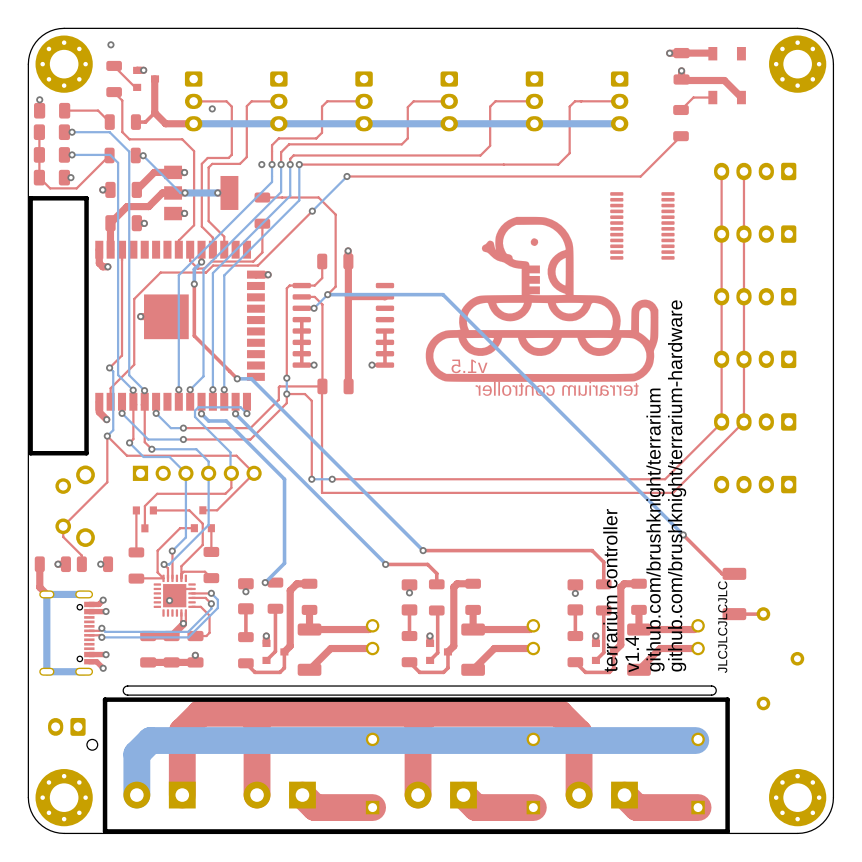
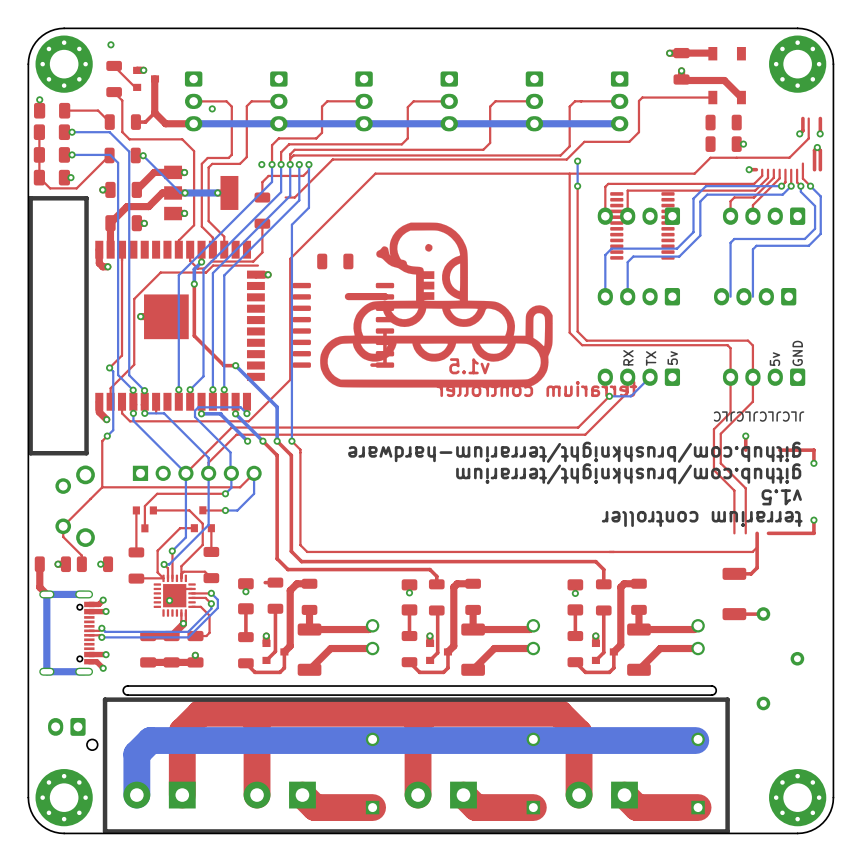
top track: (693, 97) (681, 110) -> (693, 97) (642, 97) (638, 100) (638, 132) (629, 141) (584, 141) (566, 159) (332, 159) (294, 197)
top track: none -> (802, 118) (802, 130) (799, 133)
top track: none -> (808, 118) (808, 138) (789, 157) (736, 157)
top track: none -> (820, 118) (820, 133)
part: none -> (723, 122)
part: (681, 123) -> none
via: none -> (799, 133)
via: none -> (820, 133)
top track: (681, 136) (640, 176) (347, 176) -> none
top track: (490, 142) (490, 145) (480, 155) -> (569, 146) (560, 155) (480, 155)
top track: none -> (490, 142) (483, 149) (294, 149) (290, 154) (290, 158)
part: none -> (723, 144)
via: none -> (743, 144)
top track: (569, 146) (569, 153) (558, 164) (299, 164) -> none
via: none -> (817, 147)
top track: none -> (736, 157) (710, 157) (694, 173) (375, 173) (290, 258) (290, 379) (248, 421) (130, 421) (122, 413)
bottom track: none -> (577, 161) (577, 188)
via: none -> (577, 161)
top track: none -> (802, 163) (802, 178) (810, 186)
bottom track: none -> (308, 164) (308, 207) (291, 224) (291, 441)
via: none -> (308, 164)
via: none -> (749, 169)
top track: none -> (756, 169) (749, 169)
top track: none -> (762, 169) (762, 175) (754, 183) (608, 183) (605, 186) (605, 216)
top track: none -> (768, 169) (768, 177) (755, 190) (627, 190) (627, 216)
top track: none -> (773, 169) (773, 177) (754, 197) (734, 197) (730, 201) (730, 216)
top track: none -> (779, 169) (779, 178) (752, 205) (752, 216)
top track: none -> (785, 169) (785, 182) (781, 186)
top track: none -> (791, 169) (791, 186)
top track: none -> (797, 169) (797, 182) (800, 186)
top track: none -> (820, 169) (820, 150) (817, 147) (814, 150) (814, 169)
top track: (721, 171) (721, 422) (665, 479) (332, 479) -> none
top track: (743, 171) (743, 421) (673, 492) (322, 492) (322, 386) -> none
part: (755, 171) -> none
top track: none -> (569, 173) (569, 332) (582, 345) (727, 345) (730, 348) (730, 412) (713, 429) (713, 470) (734, 490) (734, 533)
bottom track: (347, 176) (312, 211) -> none
via: (347, 176) -> none
top track: none -> (577, 186) (577, 331) (586, 340) (748, 340) (752, 345) (752, 401) (720, 433) (720, 463) (745, 488) (745, 533)
via: none -> (577, 186)
bottom track: none -> (781, 186) (706, 186) (693, 198) (693, 232) (677, 248) (611, 248) (605, 255) (605, 296)
via: none -> (781, 186)
bottom track: none -> (791, 186) (782, 194) (707, 194) (700, 201) (700, 235) (679, 256) (633, 256) (627, 262) (627, 296)
via: none -> (791, 186)
bottom track: none -> (800, 186) (800, 191) (815, 206) (815, 228) (804, 238) (734, 238) (730, 242) (730, 296)
via: none -> (800, 186)
bottom track: none -> (810, 186) (820, 196) (820, 233) (808, 245) (756, 245) (752, 249) (752, 296)
via: none -> (810, 186)
top track: (285, 197) (262, 197) -> (308, 164) (308, 170) (303, 175) (268, 175) (262, 182) (262, 197)
top track: (294, 197) (318, 197) (335, 214) (335, 286) (327, 294) -> none
top track: (312, 211) (257, 265) -> none
via: (312, 211) -> none
part: none -> (638, 216)
part position: (755, 234) -> (764, 216)
top track: (348, 250) (348, 386) -> none
via: (348, 250) -> none
top track: (322, 261) (322, 278) (314, 285) (289, 285) (286, 288) (286, 378) -> none
via: (327, 294) -> none
top track: (301, 296) (314, 296) (322, 304) (322, 386) -> none
part: none -> (638, 296)
drawing position: (542, 299) -> (436, 305)
bottom track: (314, 308) (327, 294) (443, 294) (683, 534) -> none
via: (314, 308) -> none
top track: (301, 319) (301, 365) (314, 365) -> none
text: none -> GND (797, 353)
text: none -> 5v (672, 358)
text: none -> RX (628, 357)
text: none -> TX (651, 358)
part position: (755, 359) -> (764, 377)
text: none -> 5v (774, 359)
top track: (224, 365) (237, 378) -> (224, 365) (235, 365)
bottom track: none -> (235, 365) (277, 407) (277, 441)
via: (314, 365) -> none
via: (372, 365) -> none
top track: none -> (627, 377) (627, 392) (585, 434) (236, 434) (208, 462) (208, 473)
part: none -> (638, 377)
bottom track: none -> (650, 377) (630, 396) (609, 396)
bottom track: (237, 378) (251, 378) (423, 550) -> none
via position: (237, 378) -> (235, 365)
bottom track: (286, 378) (286, 394) -> none
via: (286, 378) -> none
top track: (322, 386) (279, 386) (278, 399) (250, 428) (183, 428) -> none
part: (335, 386) -> none
via: (286, 394) -> none
top track: none -> (609, 396) (578, 427) (231, 427) (185, 473)
via: none -> (609, 396)
top track: (133, 401) (133, 439) (129, 442) -> none
top track: (144, 401) (144, 442) (151, 449) -> none
bottom track: (122, 413) (148, 439) (183, 439) -> none
via: (122, 413) -> none
via: none -> (133, 413)
via: none -> (144, 413)
bottom track: (156, 413) (170, 428) (183, 428) -> none
via: (156, 413) -> none
bottom track: (201, 413) (208, 420) (226, 420) (284, 479) (284, 563) (265, 582) -> (201, 413) (220, 413) (247, 441)
part: (755, 421) -> none
via: (183, 428) -> none
top track: none -> (107, 436) (102, 441) (102, 487) (240, 487)
top track: none -> (745, 436) (745, 450)
via: none -> (745, 436)
top track: (183, 439) (250, 439) (286, 403) (286, 394) (304, 394) (311, 400) (311, 479) -> none
via: (183, 439) -> none
via: none -> (247, 441)
bottom track: (262, 441) (386, 564) -> none
via: none -> (262, 441)
via: none -> (277, 441)
via: none -> (291, 441)
bottom track: (129, 442) (143, 456) (169, 456) -> (133, 413) (133, 420) (169, 456)
via: (129, 442) -> none
bottom track: (151, 449) (196, 449) (208, 461) -> (144, 413) (164, 413) (208, 457) (208, 461)
via: (151, 449) -> none
top track: none -> (779, 450) (813, 450) (813, 463)
text: none -> github.com/brushknight/terrarium-hardware (574, 452)
via: none -> (813, 463)
top track: (231, 473) (231, 487) (225, 493) -> none
bottom track: none -> (231, 473) (231, 487) (225, 493)
top track: (254, 473) (236, 455) (126, 455) (107, 436) (107, 482) (102, 487) -> none
bottom track: none -> (254, 473) (254, 493) (237, 510) (225, 510)
text: none -> github.com/brushknight/terrarium (628, 473)
via: (311, 479) -> none
bottom track: (332, 479) (311, 479) -> none
via: (332, 479) -> none
part: (755, 484) -> none
text: github.com/brushknight/terrarium-hardware (677, 485) -> none
top track: (240, 487) (217, 510) (202, 510) -> (225, 510) (202, 510)
via: none -> (225, 493)
text: none -> v1.5 (781, 497)
via: none -> (225, 510)
text: none -> terrarium controller (702, 518)
top track: none -> (813, 520) (813, 533) (768, 533)
via: none -> (813, 520)
text: github.com/brushknight/terrarium (655, 530) -> none
top track: (683, 534) (722, 573) (734, 573) -> (291, 441) (300, 449) (300, 545) (307, 551) (752, 551) (757, 547) (757, 533) (757, 567) (751, 573) (734, 573)
via: (683, 534) -> none
top track: (423, 550) (592, 550) (603, 562) (603, 569) -> (277, 441) (291, 455) (291, 551) (301, 561) (595, 561) (603, 569)
via: (423, 550) -> none
top track: (385, 564) (427, 564) (436, 573) (436, 576) -> (262, 441) (277, 455) (277, 558) (287, 569) (429, 569) (436, 576)
via: (385, 564) -> none
via: (265, 582) -> none
text: terrarium controller (610, 590) -> none
text rotation: 0° (722, 627) -> 90° counterclockwise (759, 416)
text position: JLCJLCJLCJLC (722, 627) -> JLCJLCJLCJLC (759, 416)
text: v1.4 (632, 654) -> none

